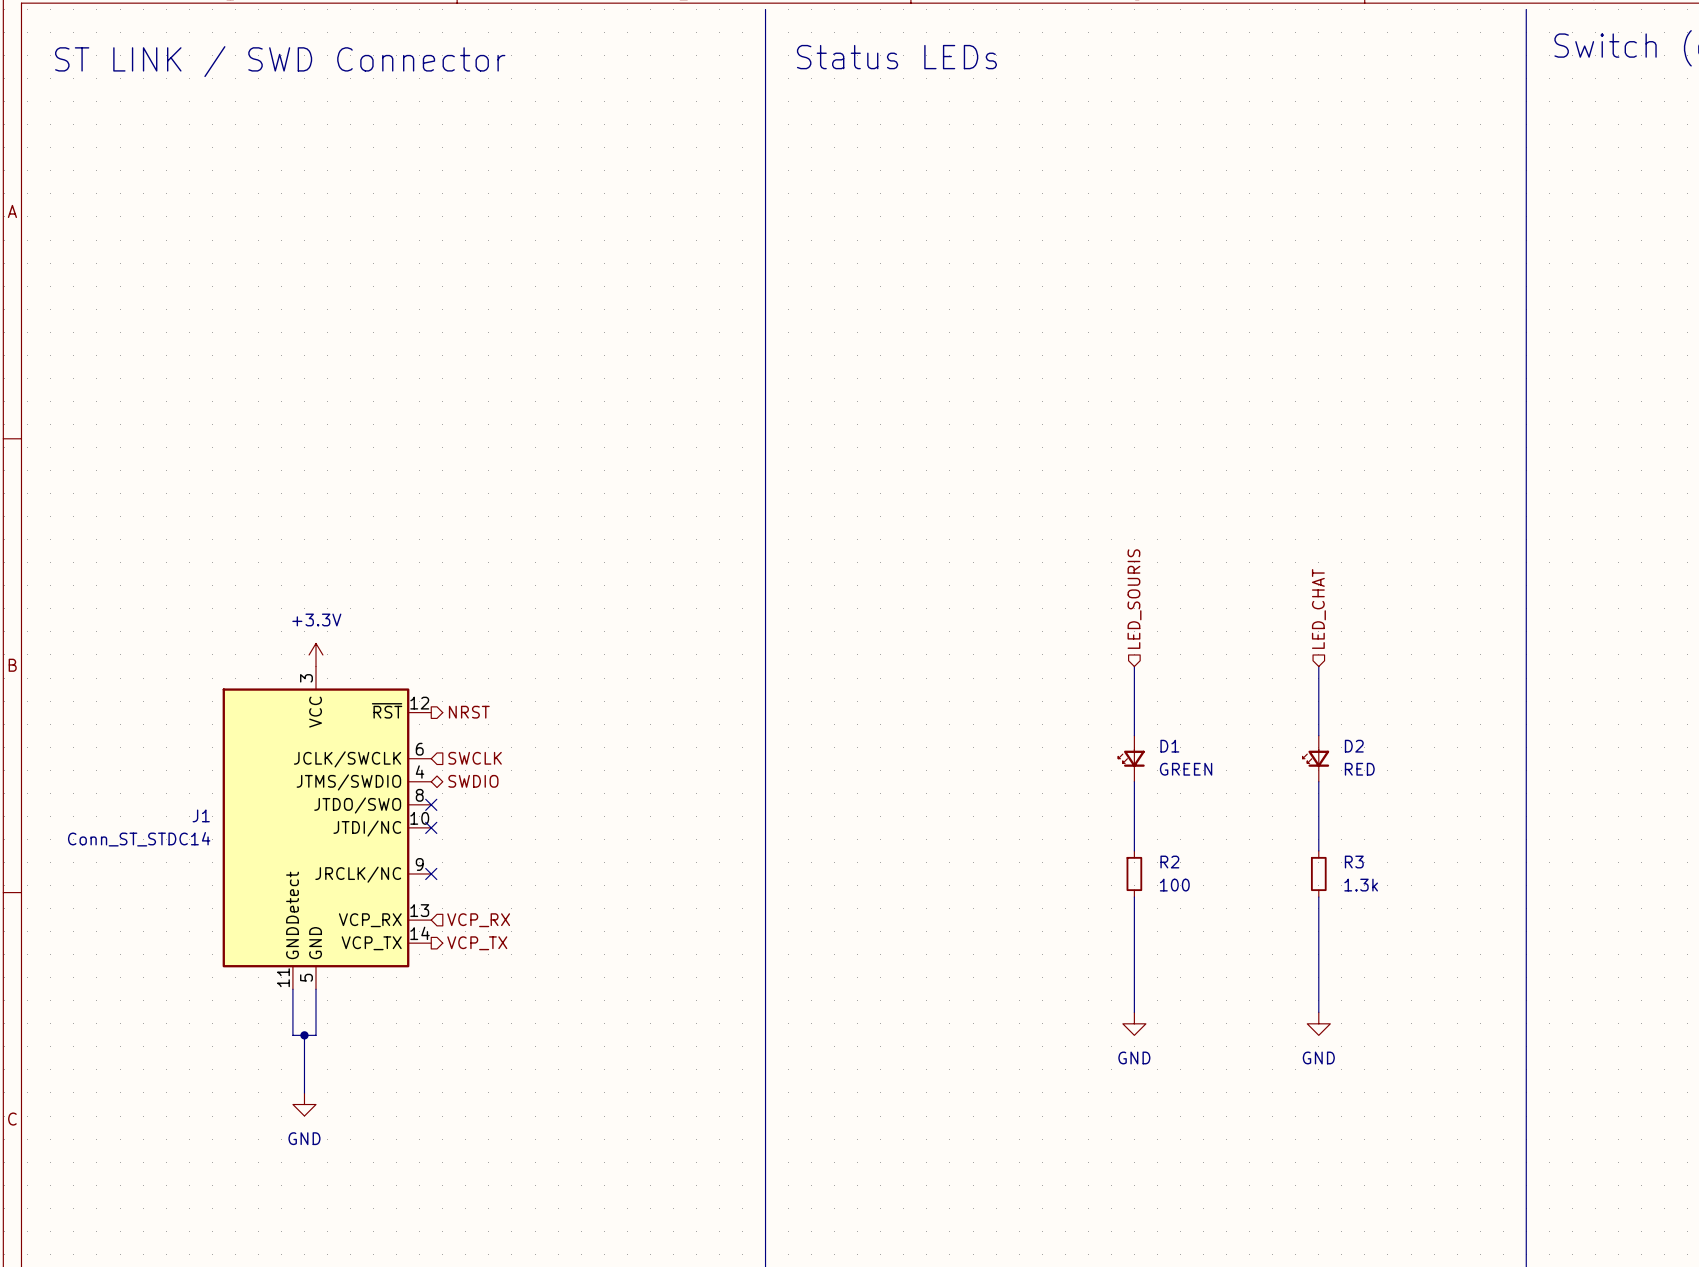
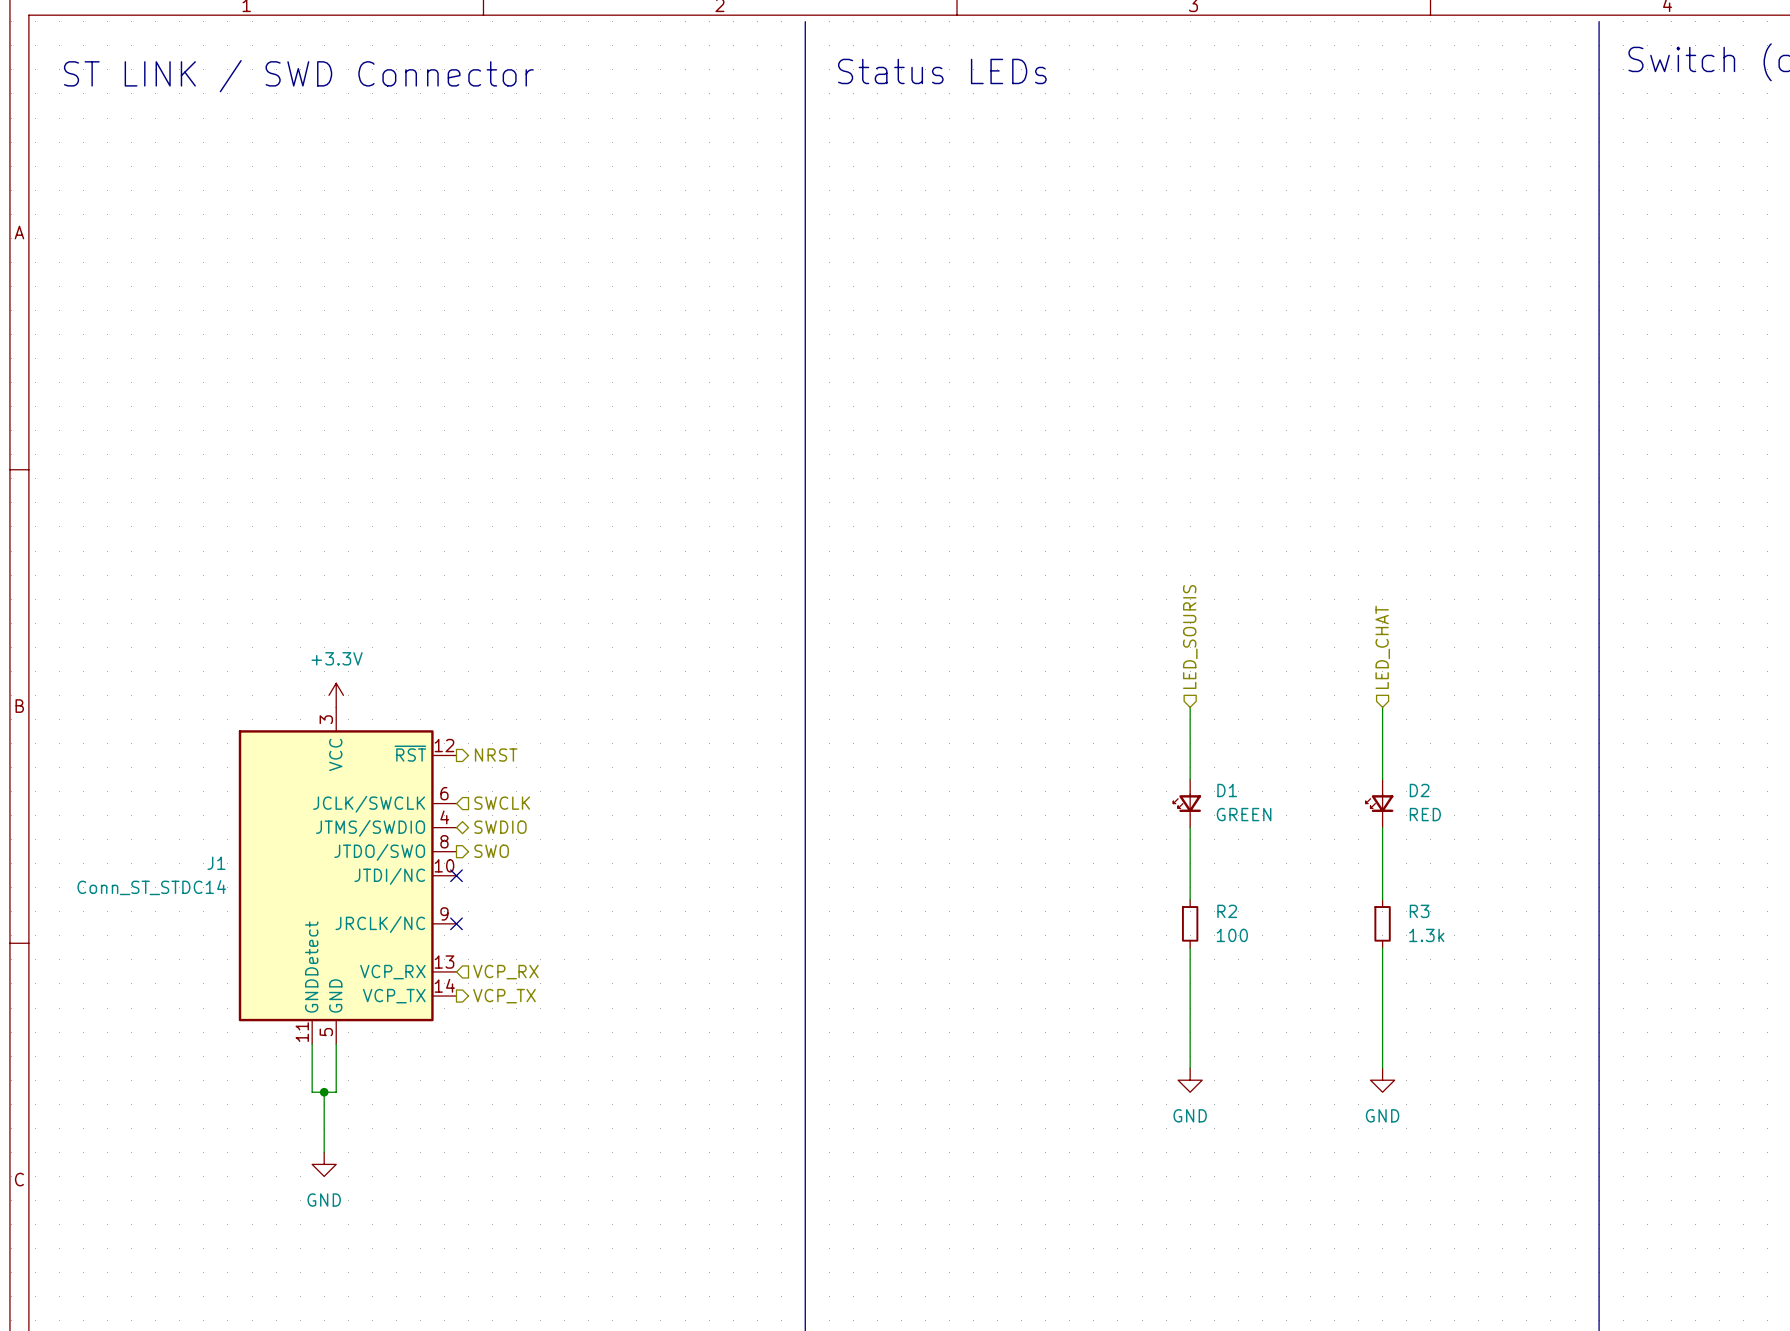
no-connect mark: (431, 804) -> none
hierarchical label: none -> SWO (491, 851)

